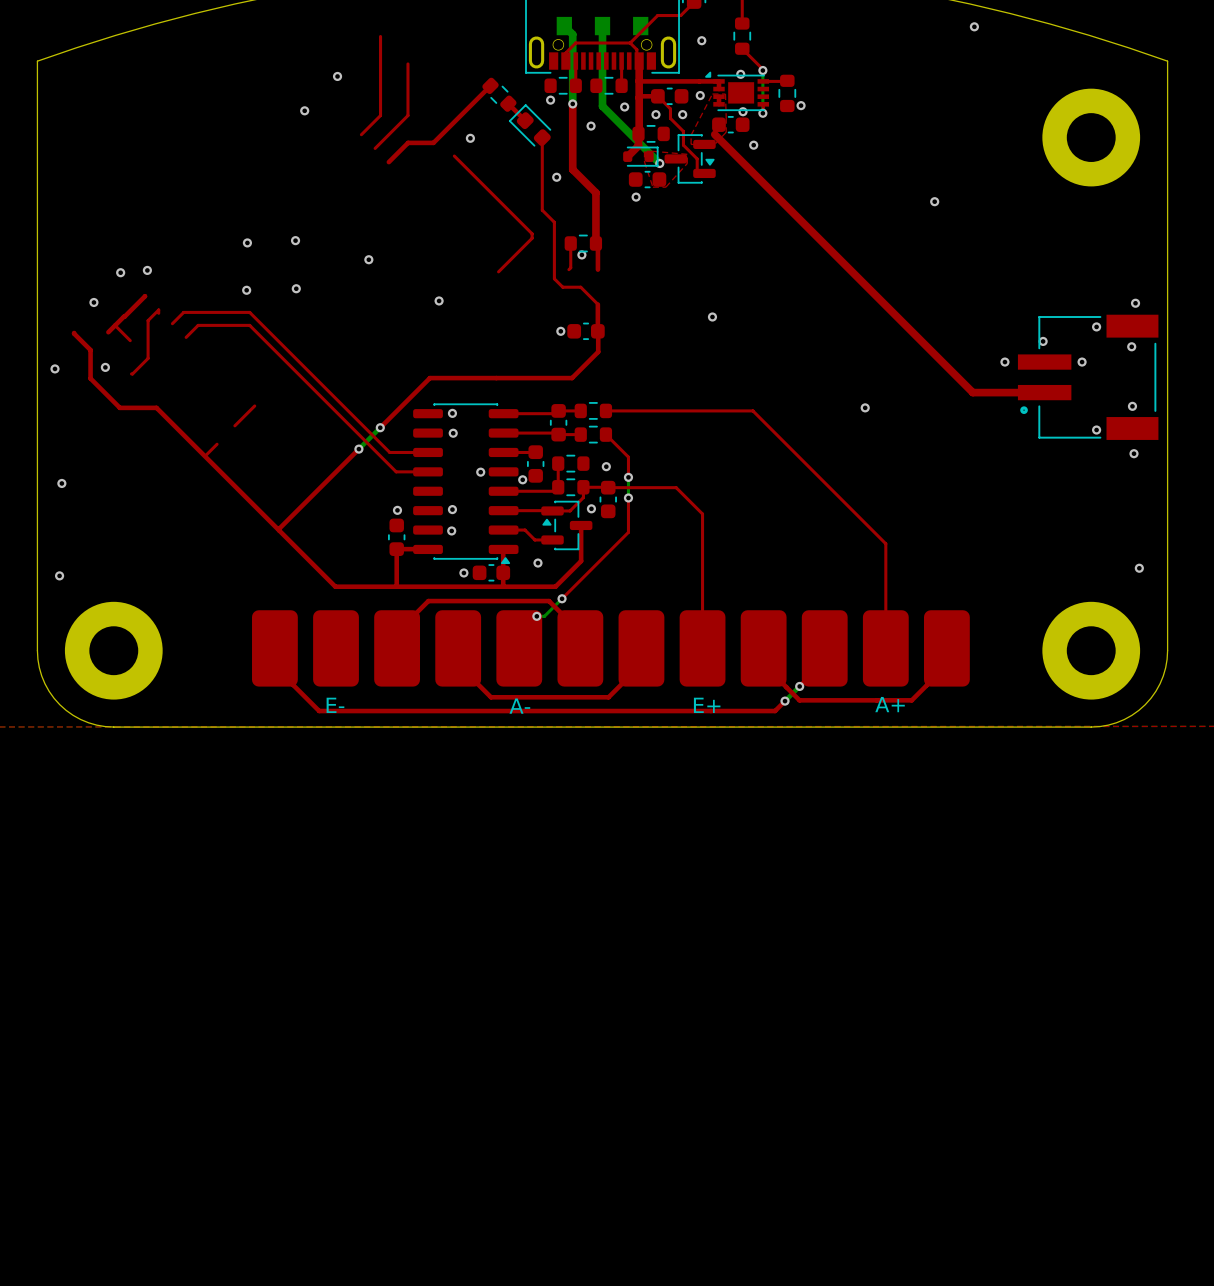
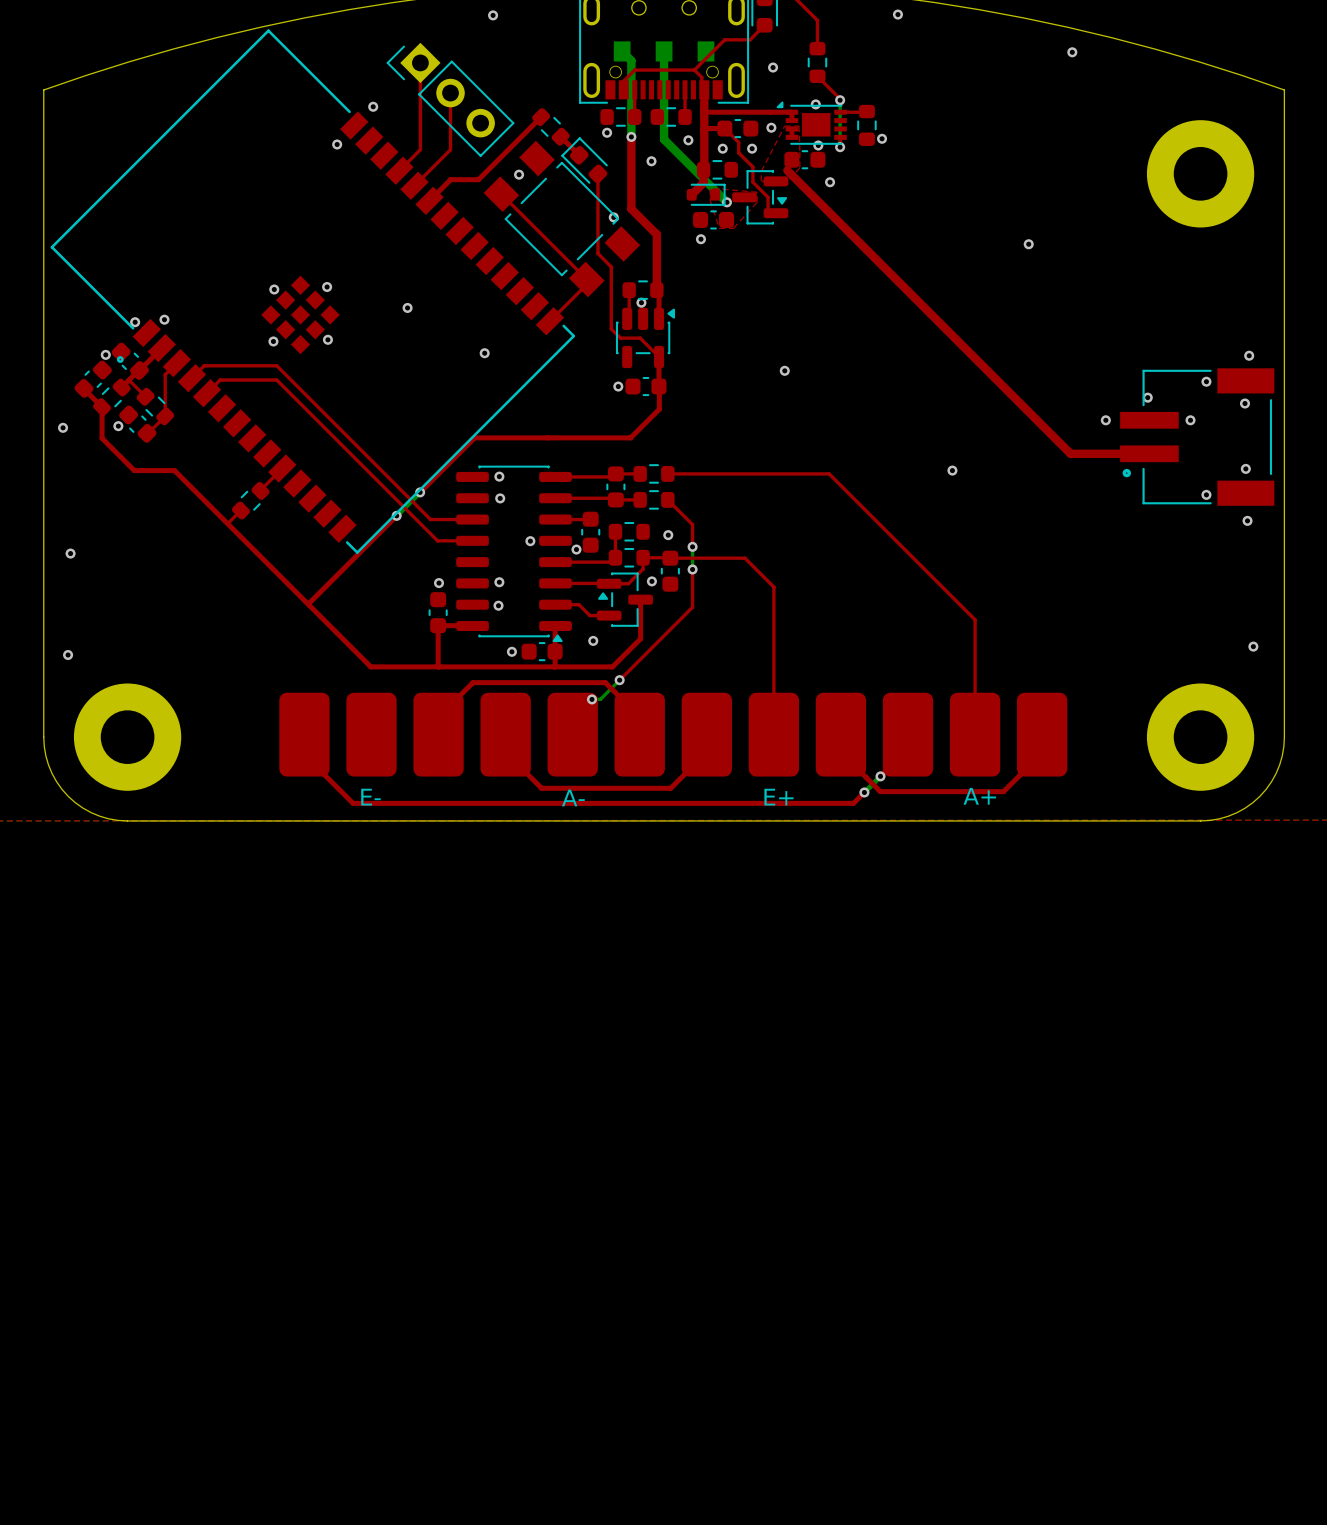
part: none -> (450, 99)
part: none -> (561, 219)
part: none -> (312, 291)
part: none -> (645, 337)
part: none -> (130, 361)
part: none -> (93, 379)
part: none -> (111, 397)
part: none -> (155, 406)
part: none -> (137, 424)
part: none -> (250, 500)

